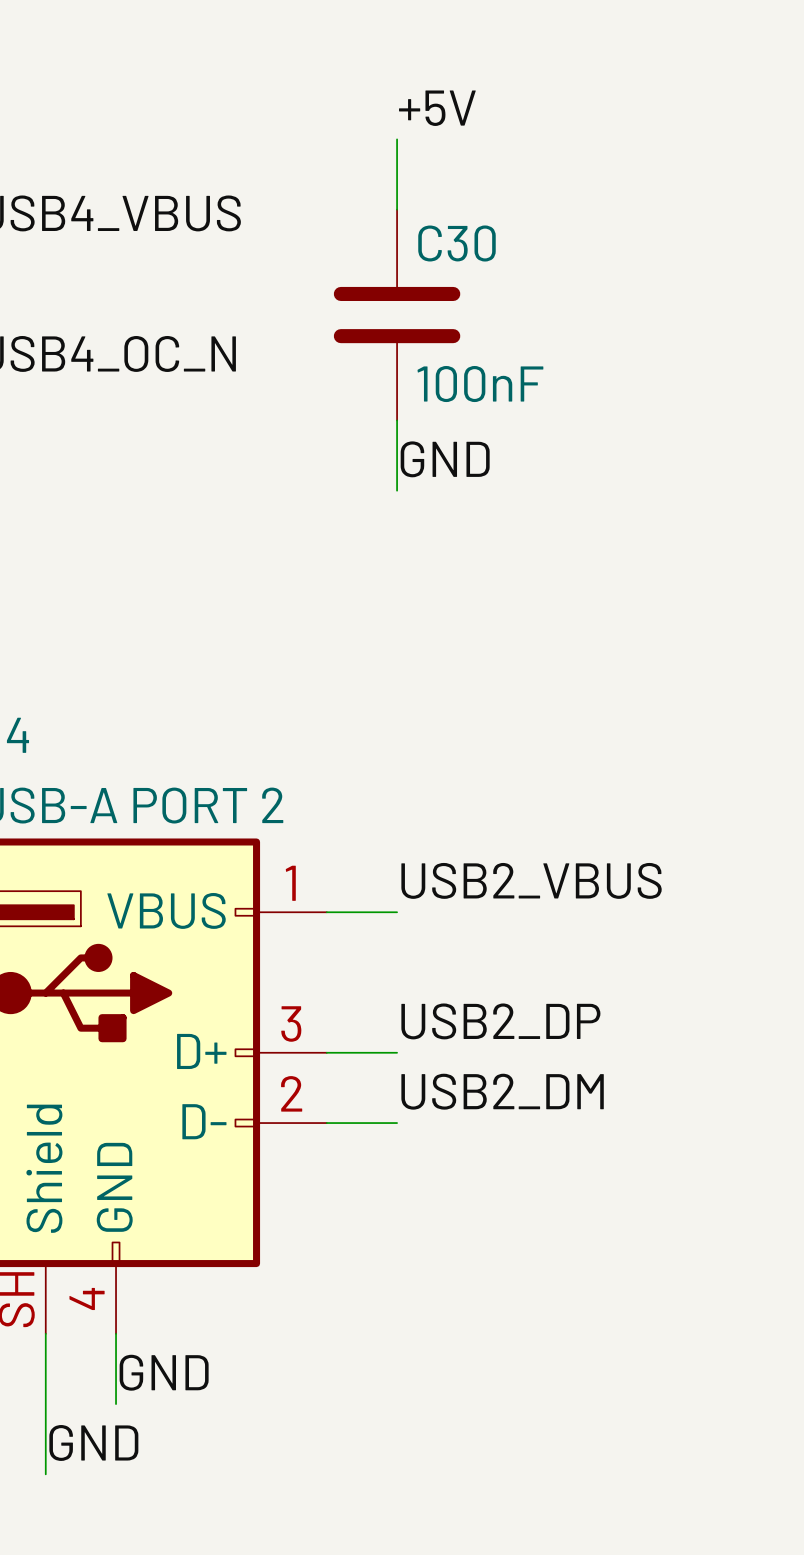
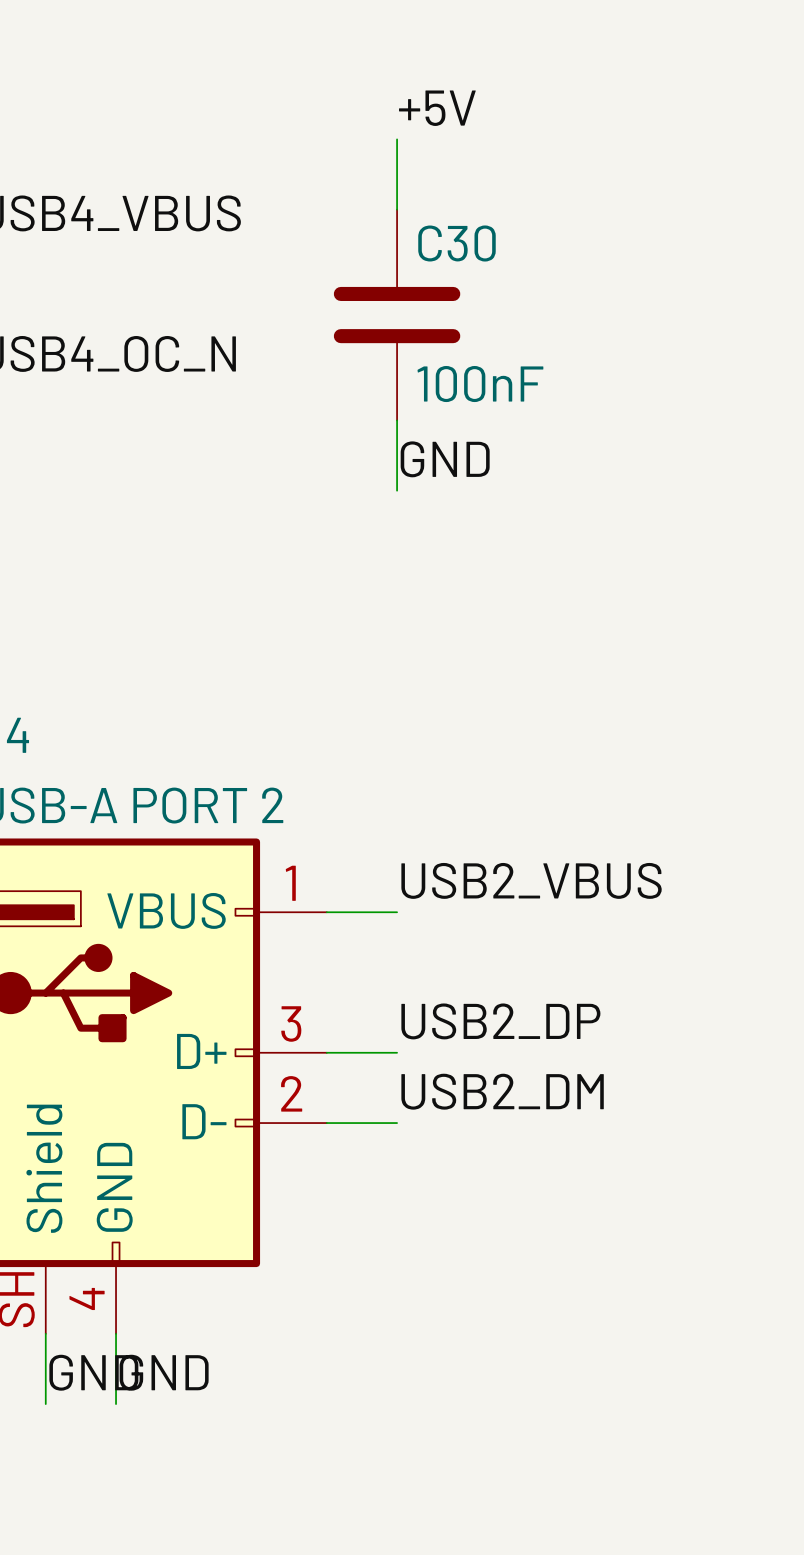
wire: (45, 1404) (45, 1474) -> none
label position: GND (93, 1442) -> GND (93, 1372)

